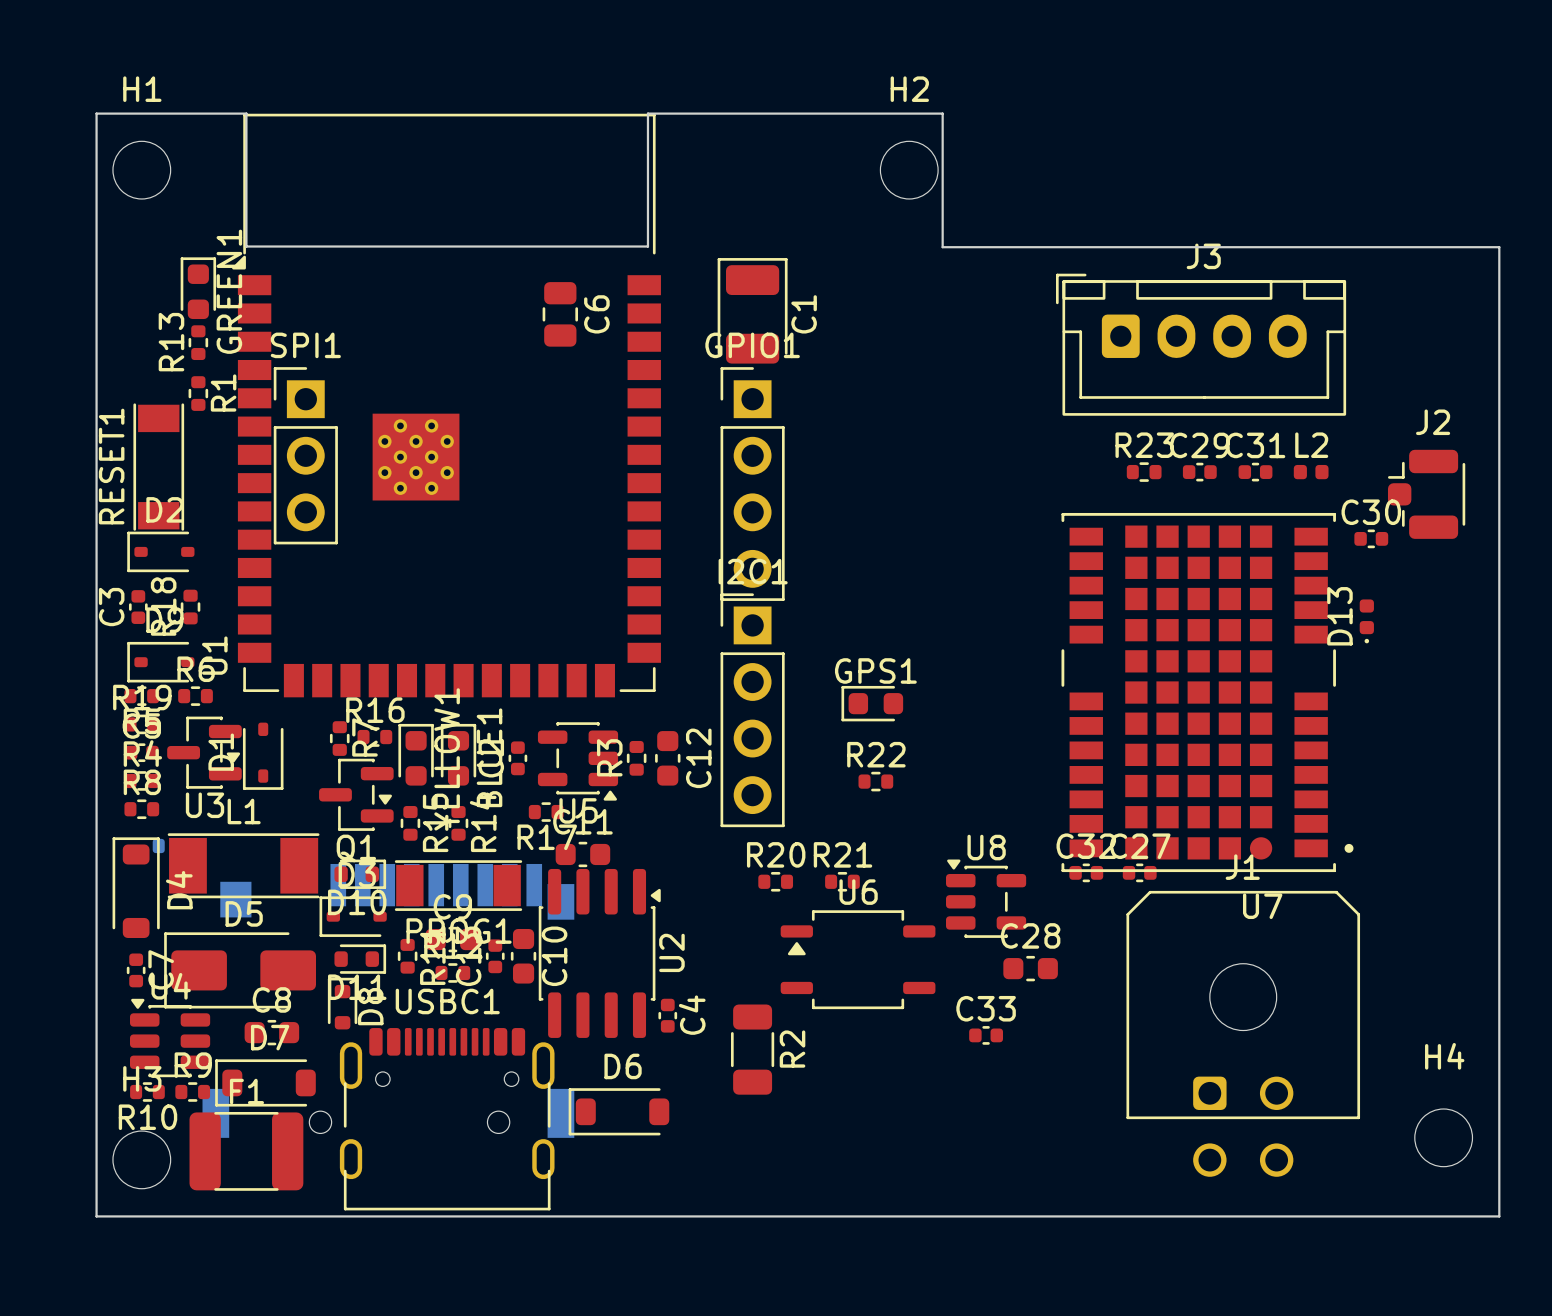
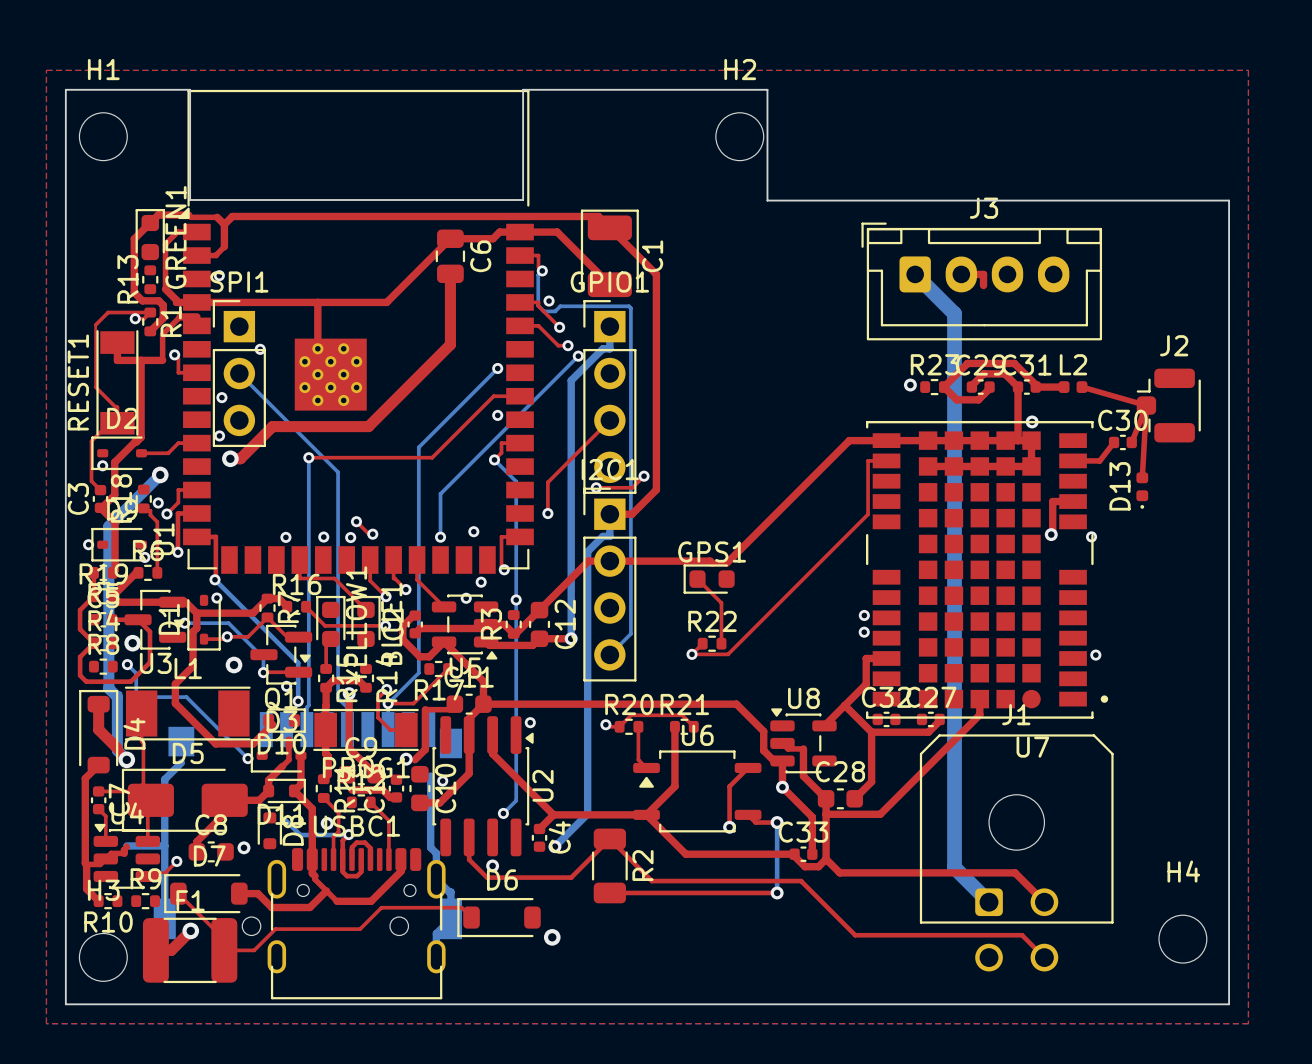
top zone outline: none -> (46, 70) (1248, 70) (1248, 1023) (46, 1023) (46, 70)
top track: none -> (224, 224) (224, 246) (216, 255) (196, 255)
top track: none -> (224, 224) (217, 217) (158, 215) (134, 238) (134, 292) (142, 300) (158, 300) (163, 305) (163, 318) (150, 331)
top track: none -> (224, 224) (232, 216) (598, 216) (656, 274) (656, 489) (632, 514) (609, 514)
top track: none -> (196, 232) (177, 232) (165, 244) (165, 289) (176, 302) (386, 302) (450, 238) (493, 238) (499, 232) (557, 232) (609, 284)
top track: none -> (520, 255) (538, 255) (538, 267) (542, 270)
bottom track: none -> (542, 270) (538, 275) (538, 305) (543, 311) (555, 311) (560, 306) (628, 306) (630, 308) (630, 633) (609, 654)
via: none -> (542, 270)
top track: none -> (450, 273) (450, 344) (368, 426) (272, 426) (240, 458) (230, 458)
bottom track: none -> (915, 274) (954, 313) (954, 867) (989, 902)
top track: none -> (961, 274) (983, 274) (983, 285)
via: none -> (219, 275)
via: none -> (549, 301)
top track: none -> (317, 302) (317, 348)
top track: none -> (520, 302) (538, 302) (538, 306) (559, 327)
top track: none -> (196, 316) (180, 316) (162, 334) (162, 360) (117, 360) (117, 342)
top track: none -> (135, 318) (144, 318) (150, 312) (108, 312) (95, 324) (95, 387) (117, 407) (117, 423)
via: none -> (135, 318)
top track: none -> (520, 325) (538, 325) (558, 345) (568, 345)
bottom track: none -> (609, 326) (609, 348) (602, 348) (571, 380) (571, 638)
via: none -> (559, 327)
via: none -> (568, 345)
via: none -> (260, 349)
top track: none -> (174, 354) (178, 358) (178, 372) (196, 372)
via: none -> (174, 354)
bottom track: none -> (578, 356) (440, 493) (440, 537)
via: none -> (578, 356)
top track: none -> (141, 360) (141, 437) (114, 462) (114, 494) (101, 508)
bottom track: none -> (497, 368) (418, 447) (418, 672) (388, 703) (388, 729)
via: none -> (497, 368)
bottom track: none -> (239, 373) (338, 472) (338, 698) (347, 707)
via: none -> (910, 385)
top track: none -> (971, 387) (983, 373) (1004, 373) (1018, 387) (1018, 440)
top track: none -> (989, 387) (978, 399) (956, 399) (943, 387) (967, 363) (1014, 363) (1035, 384) (1035, 387) (1064, 387)
top track: none -> (1082, 387) (1146, 405)
top track: none -> (520, 396) (493, 396) (432, 457) (308, 457)
via: none -> (221, 397)
top track: none -> (1146, 405) (1131, 442)
top track: none -> (1146, 405) (1142, 477)
top track: none -> (117, 415) (91, 441) (91, 481) (100, 490)
via: none -> (497, 415)
top track: none -> (609, 420) (547, 482) (547, 513)
via: none -> (1032, 421)
via: none -> (219, 435)
top track: none -> (1114, 442) (1099, 460) (1073, 460)
top track: none -> (196, 443) (178, 443) (168, 453) (141, 453)
top track: none -> (520, 443) (501, 443) (501, 452) (494, 459)
bottom track: none -> (308, 457) (308, 705) (306, 707) (306, 729)
via: none -> (308, 457)
via: none -> (230, 458)
bottom track: none -> (494, 459) (516, 481) (516, 800) (503, 813)
via: none -> (494, 459)
top track: none -> (886, 460) (868, 460) (868, 514) (728, 654) (692, 654) (702, 643)
via: none -> (102, 465)
top track: none -> (928, 466) (1031, 466) (1031, 440) (849, 440) (726, 563) (712, 563) (710, 561) (588, 561) (515, 633) (504, 624) (486, 624) (482, 628) (420, 628) (415, 633)
bottom track: none -> (160, 474) (108, 526) (108, 688) (117, 697) (117, 750) (126, 759)
via: none -> (160, 474)
top track: none -> (644, 476) (632, 487) (596, 487)
via: none -> (644, 476)
via: none -> (596, 487)
top track: none -> (196, 490) (178, 490) (178, 502) (166, 514)
top track: none -> (1073, 501) (1052, 501) (1051, 534)
via: none -> (158, 502)
top track: none -> (101, 508) (115, 522) (115, 570) (112, 572)
top track: none -> (143, 508) (150, 510) (150, 515) (157, 521) (157, 572)
D13 position: (1366, 621) -> (1142, 490)
top track: none -> (196, 513) (177, 513) (177, 552)
via: none -> (547, 513)
via: none -> (166, 514)
bottom track: none -> (609, 514) (609, 536) (602, 536) (587, 551) (587, 813) (554, 846)
top track: none -> (356, 521) (368, 534) (372, 534)
via: none -> (356, 521)
via: none -> (473, 531)
via: none -> (372, 534)
via: none -> (1051, 534)
top track: none -> (196, 536) (215, 536) (214, 579)
via: none -> (323, 537)
top track: none -> (520, 536) (501, 536) (501, 566) (504, 569)
via: none -> (1091, 536)
via: none -> (285, 537)
via: none -> (350, 537)
via: none -> (440, 537)
via: none -> (88, 544)
via: none -> (177, 552)
via: none -> (144, 557)
top track: none -> (299, 560) (299, 578) (334, 578) (365, 609)
top track: none -> (370, 560) (370, 580) (386, 596)
top track: none -> (393, 560) (393, 578) (405, 589)
top track: none -> (417, 560) (417, 579) (444, 606)
via: none -> (504, 569)
top track: none -> (93, 572) (93, 596) (80, 610) (80, 629) (93, 643) (80, 657) (80, 675) (86, 681) (130, 681) (150, 662) (150, 631) (138, 619) (112, 619)
top track: none -> (138, 572) (136, 572) (112, 596) (118, 602) (185, 602) (196, 613)
top track: none -> (697, 579) (721, 603) (721, 643)
bottom track: none -> (214, 579) (298, 662) (298, 701)
via: none -> (214, 579)
via: none -> (481, 582)
via: none -> (405, 589)
via: none -> (386, 596)
via: none -> (216, 598)
via: none -> (466, 598)
via: none -> (516, 599)
top track: none -> (287, 606) (279, 598) (267, 598) (252, 613) (196, 613)
top track: none -> (306, 606) (325, 625) (385, 625)
top track: none -> (196, 613) (196, 628) (193, 631) (193, 666) (175, 683) (175, 703) (215, 743) (253, 743) (272, 724)
top track: none -> (415, 615) (402, 626) (402, 639) (419, 656) (429, 656) (444, 641) (483, 681) (483, 704)
via: none -> (864, 615)
bottom track: none -> (184, 623) (228, 623) (263, 658) (263, 672)
via: none -> (184, 623)
via: none -> (385, 625)
via: none -> (864, 632)
via: none -> (227, 636)
top track: none -> (298, 637) (287, 637) (267, 617) (248, 636) (204, 639)
top track: none -> (330, 638) (326, 643) (326, 668)
top track: none -> (571, 638) (539, 638) (532, 645) (489, 645) (486, 641)
via: none -> (571, 638)
via: none -> (132, 643)
via: none -> (692, 654)
via: none -> (1095, 655)
top track: none -> (886, 658) (866, 658) (866, 684) (824, 725)
bottom track: none -> (127, 664) (136, 673) (136, 697) (186, 697) (247, 758)
via: none -> (127, 664)
via: none -> (234, 665)
top track: none -> (448, 668) (413, 703) (388, 703)
top track: none -> (298, 672) (263, 672)
via: none -> (263, 672)
via: none -> (286, 686)
top track: none -> (365, 687) (358, 680) (333, 680) (326, 687) (325, 753) (328, 756) (328, 774) (323, 779)
top track: none -> (386, 689) (377, 698) (377, 717) (390, 729) (406, 729)
via: none -> (386, 689)
top track: none -> (349, 693) (349, 748) (375, 774)
via: none -> (349, 693)
top track: none -> (979, 699) (979, 714) (880, 814) (826, 814)
via: none -> (298, 701)
via: none -> (388, 703)
top track: none -> (98, 704) (98, 729) (126, 759)
top track: none -> (454, 704) (449, 709) (425, 709) (425, 749) (415, 759)
top track: none -> (483, 704) (736, 704) (763, 731) (763, 750) (774, 760) (782, 760) (782, 787) (812, 817) (812, 854)
top track: none -> (483, 704) (469, 718) (469, 773) (439, 802) (419, 802)
top track: none -> (844, 705) (871, 732)
top track: none -> (141, 713) (143, 783) (135, 791)
top track: none -> (939, 719) (928, 732) (871, 732)
via: none -> (530, 722)
top track: none -> (605, 724) (607, 726) (619, 726) (631, 715) (682, 715) (693, 726)
via: none -> (605, 724)
top track: none -> (638, 726) (638, 759) (646, 767)
top track: none -> (674, 726) (674, 786) (646, 814)
top track: none -> (871, 732) (871, 781) (854, 798)
top track: none -> (492, 735) (492, 753) (553, 814)
top track: none -> (288, 740) (288, 759) (268, 780) (268, 790) (259, 800) (224, 800) (224, 813) (196, 841) (196, 851)
top track: none -> (782, 743) (787, 748) (803, 748) (803, 776) (826, 798) (826, 859)
top track: none -> (300, 755) (300, 784) (294, 790) (312, 808) (312, 873) (315, 879) (336, 901) (371, 901) (400, 871) (400, 859)
via: none -> (247, 758)
via: none -> (406, 759)
via: none -> (126, 759)
bottom track: none -> (181, 762) (164, 779) (164, 918)
top track: none -> (98, 765) (85, 778) (86, 864)
top track: none -> (748, 767) (729, 786) (729, 827)
bottom track: none -> (430, 776) (430, 847) (436, 853) (436, 879) (450, 892) (450, 919) (436, 933) (436, 956)
via: none -> (442, 781)
via: none -> (782, 787)
top track: none -> (351, 790) (382, 790) (390, 797) (396, 797)
top track: none -> (98, 791) (135, 791)
top track: none -> (323, 798) (338, 812) (338, 831) (333, 836) (333, 859)
top track: none -> (370, 802) (388, 820) (388, 859)
top track: none -> (147, 803) (147, 841)
top track: none -> (98, 809) (105, 816) (105, 841)
via: none -> (503, 813)
top track: none -> (553, 814) (646, 814)
top track: none -> (553, 814) (539, 828)
top track: none -> (646, 814) (685, 854) (794, 854) (805, 866) (818, 866) (826, 859)
top track: none -> (748, 814) (755, 822) (777, 822)
bottom track: none -> (284, 819) (300, 835) (348, 834)
bottom track: none -> (777, 822) (777, 892)
via: none -> (777, 822)
via: none -> (327, 823)
via: none -> (729, 827)
top track: none -> (348, 834) (342, 840) (342, 871) (347, 876) (357, 876) (361, 872) (361, 859)
via: none -> (348, 834)
top track: none -> (469, 837) (469, 859) (487, 877) (571, 877) (609, 838) (651, 881) (801, 881) (855, 935) (1022, 935) (1044, 957)
top track: none -> (126, 845) (124, 853) (111, 853) (100, 864) (86, 864)
bottom track: none -> (126, 845) (164, 845)
via: none -> (554, 846)
via: none -> (243, 847)
top track: none -> (351, 859) (351, 847) (356, 842) (365, 842) (370, 848) (370, 859)
top track: none -> (826, 859) (839, 872) (1015, 872) (1044, 902)
top track: none -> (176, 861) (165, 872) (151, 872) (147, 876)
via: none -> (176, 861)
top track: none -> (86, 864) (86, 889) (98, 901)
via: none -> (492, 865)
top track: none -> (326, 890) (309, 907) (271, 907) (257, 893) (239, 893)
top track: none -> (178, 893) (224, 939) (224, 950) (254, 950) (275, 929) (360, 929) (381, 907) (461, 907) (471, 917)
top track: none -> (609, 892) (777, 892)
via: none -> (777, 892)
top track: none -> (190, 930) (171, 950) (155, 950)
via: none -> (190, 930)
via: none -> (552, 937)

